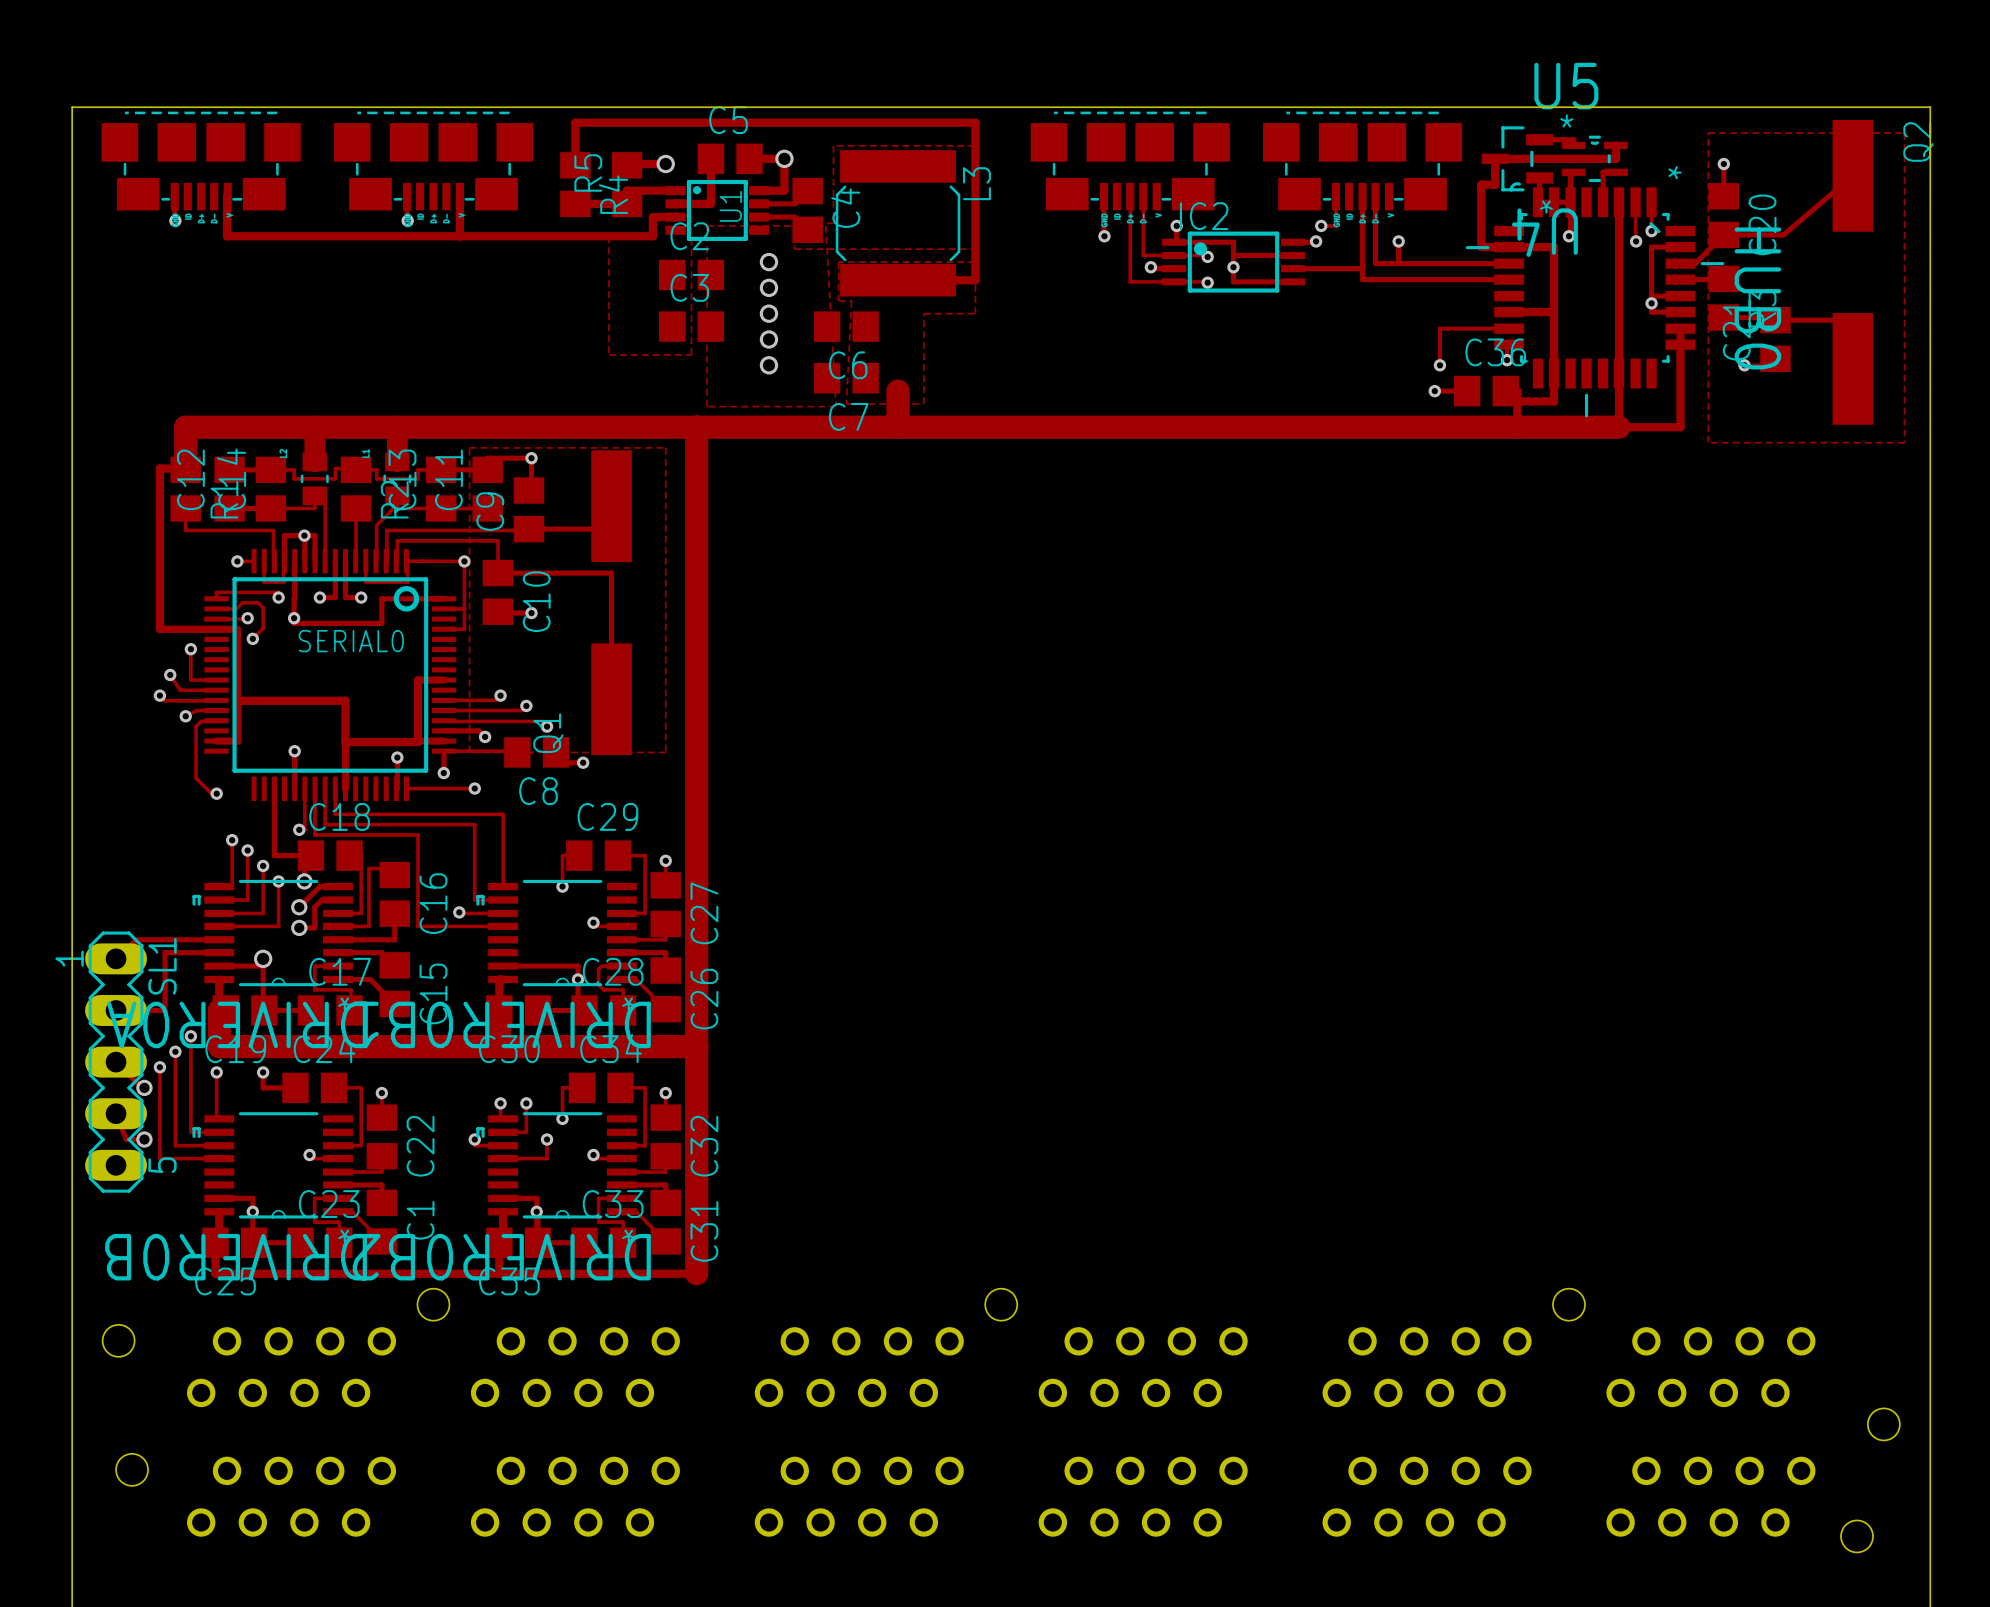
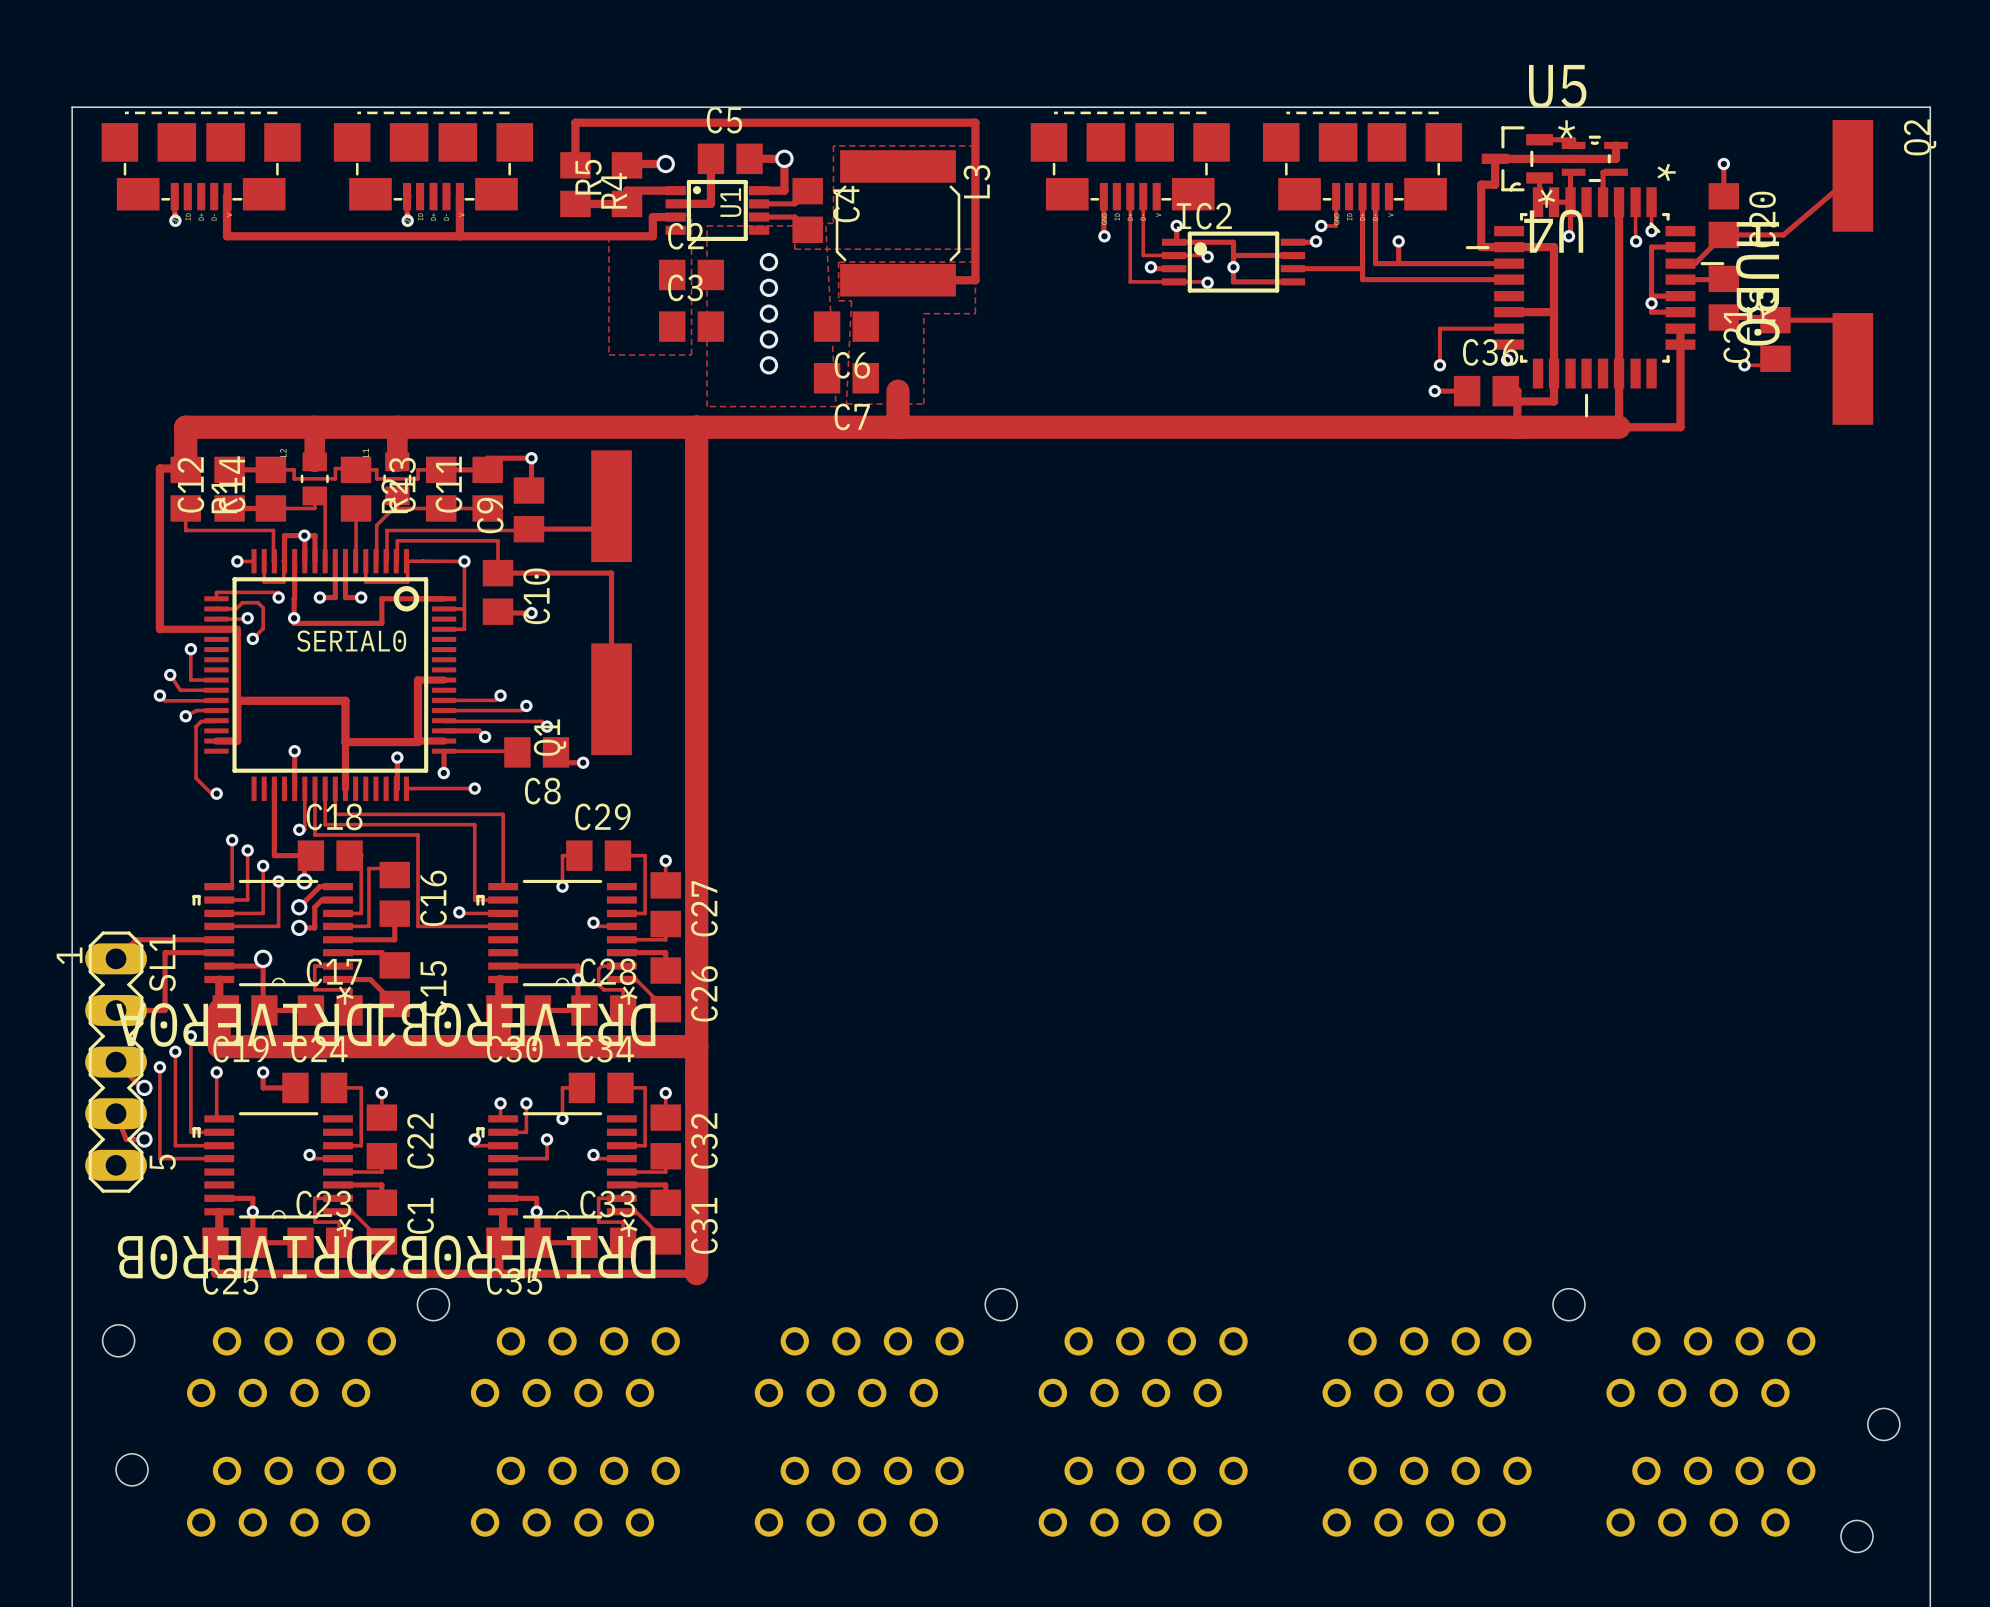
zone outline: (1708, 133) (1904, 133) (1904, 442) (1708, 442) (1708, 133) -> none
zone outline: (469, 447) (665, 447) (665, 752) (469, 752) (469, 447) -> none

